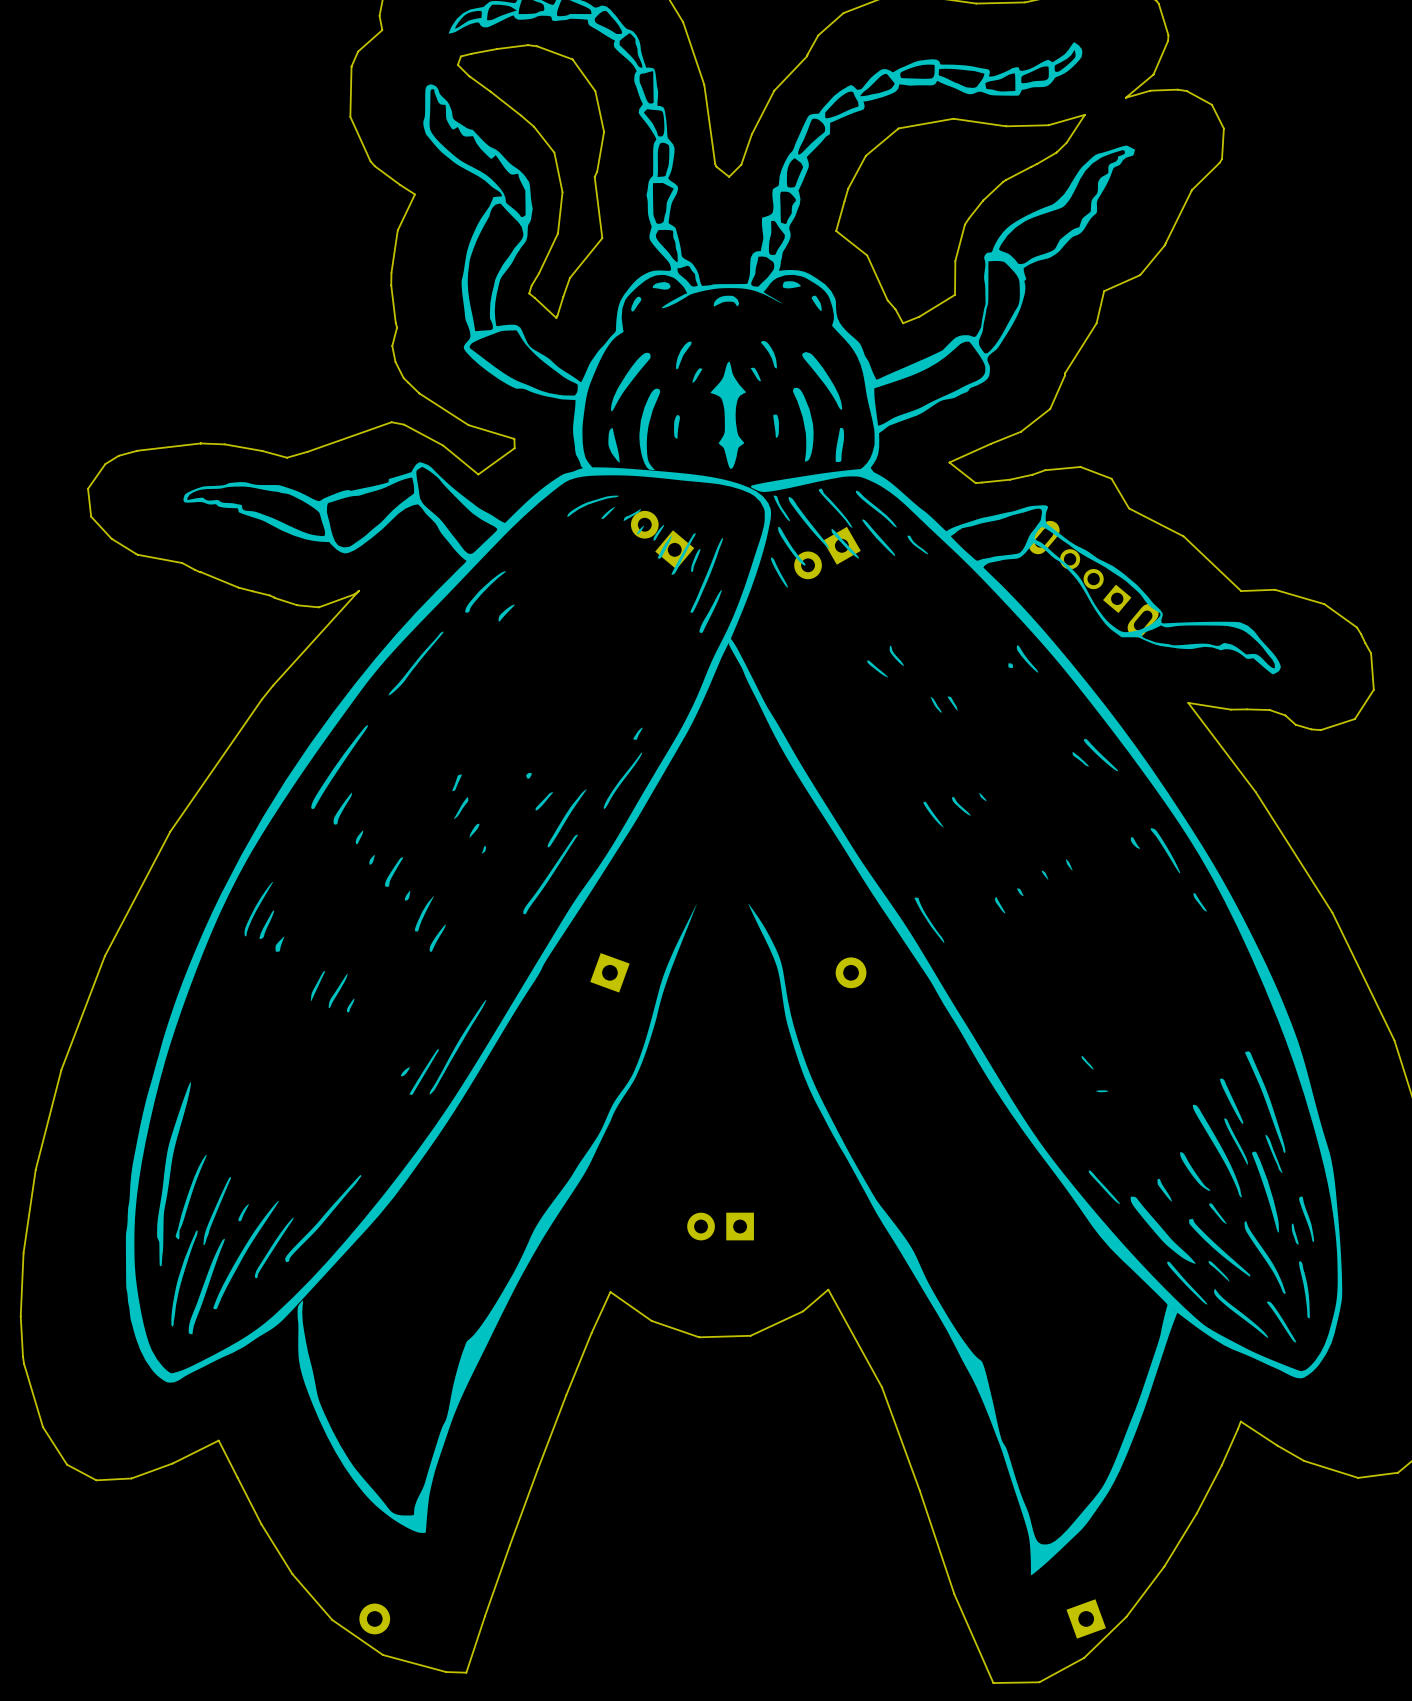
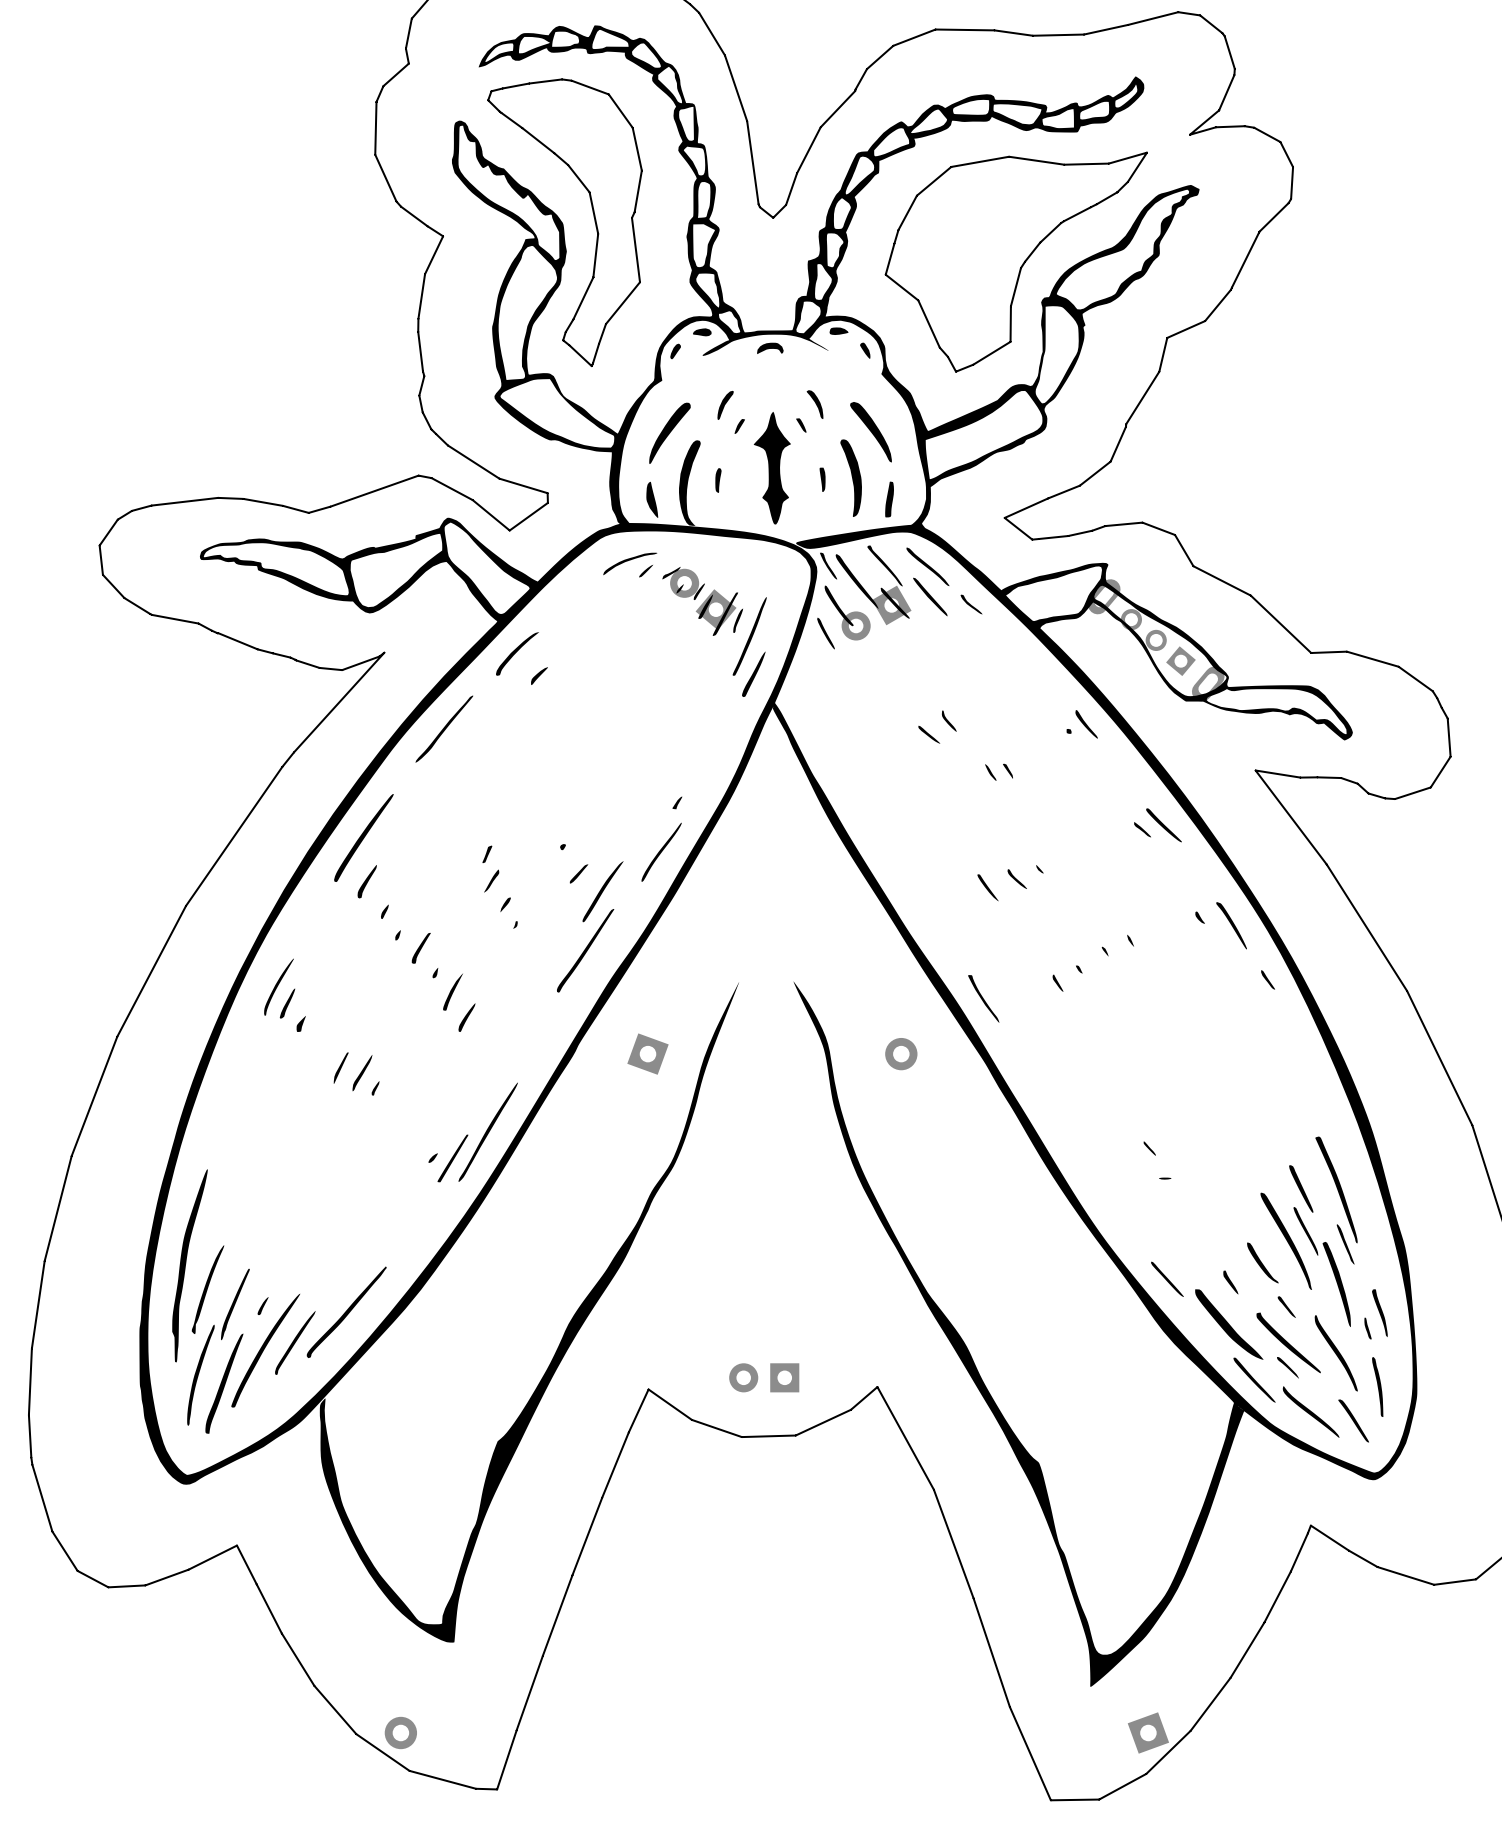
part position: (720, 1226) -> (764, 1377)

